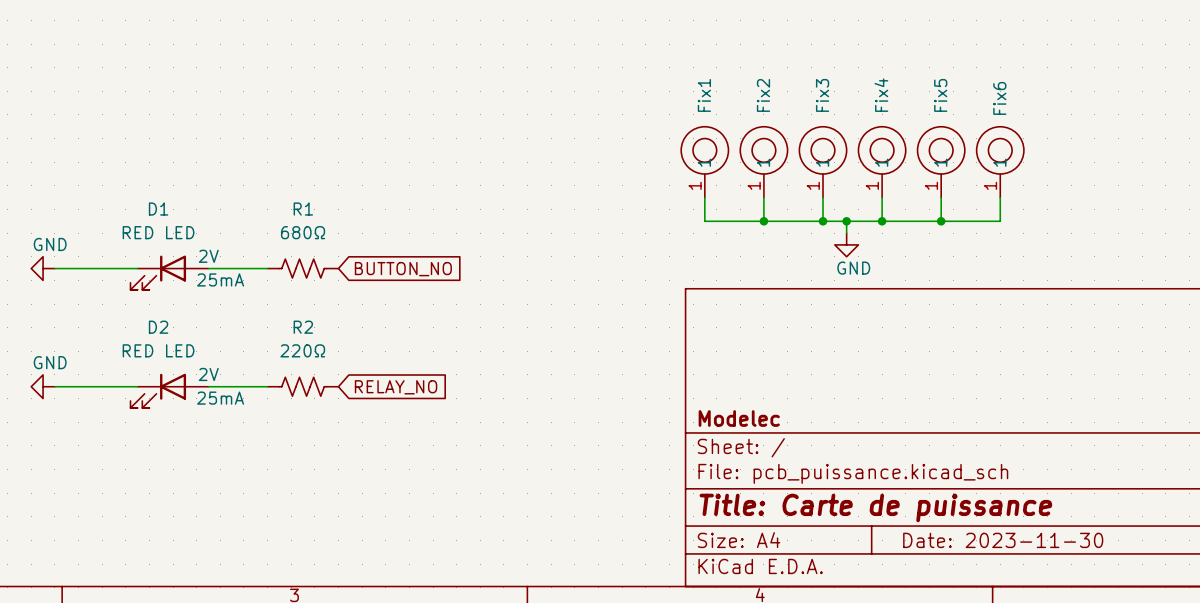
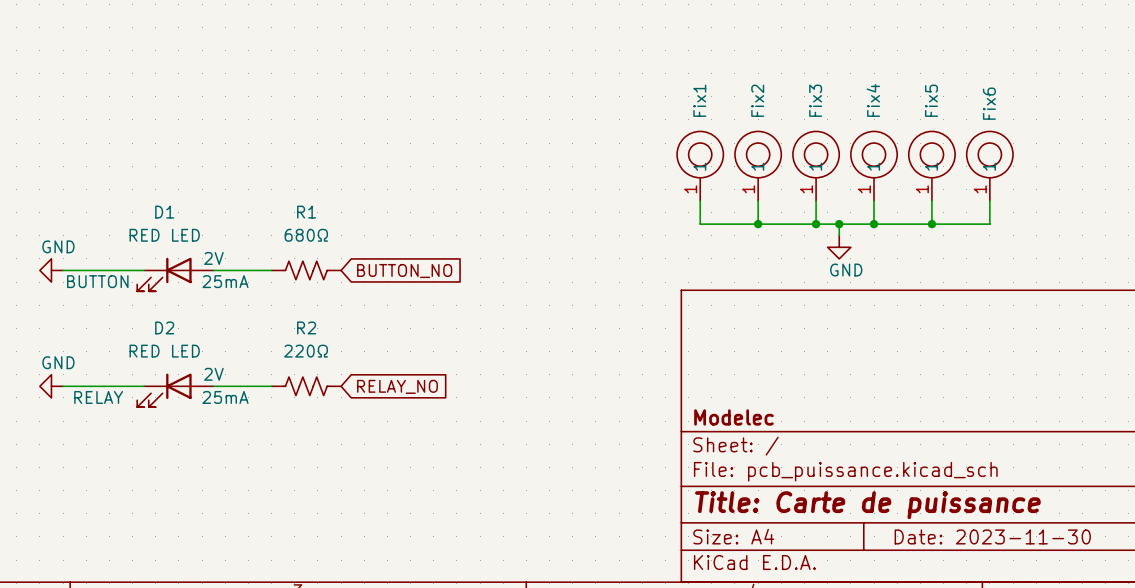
D1 text: none -> BUTTON (97, 281)
D2 text: none -> RELAY (98, 397)

